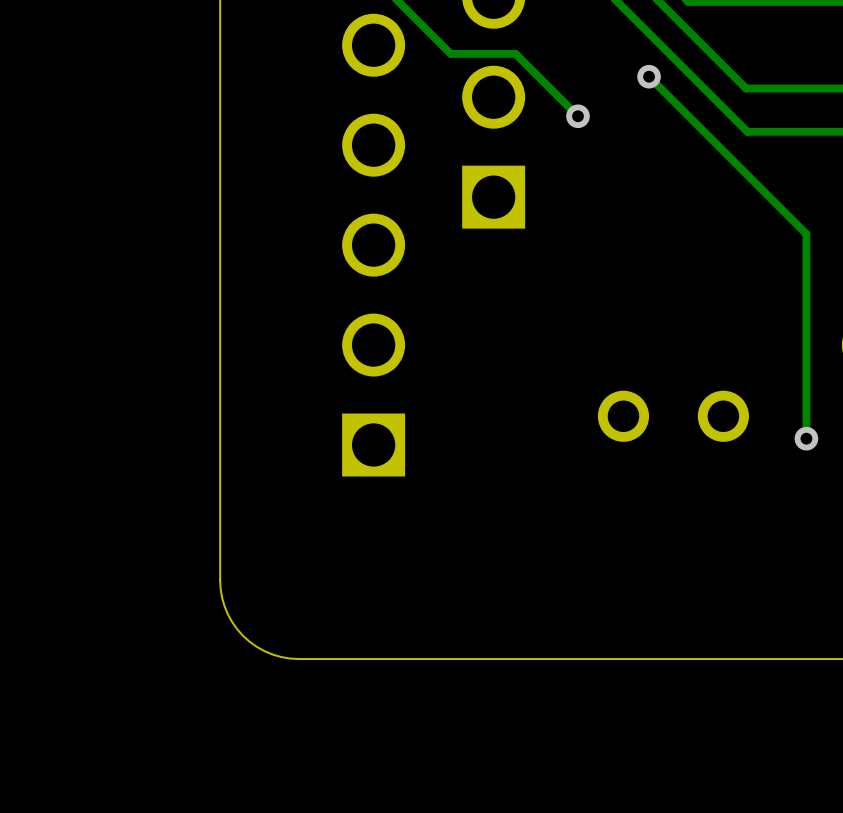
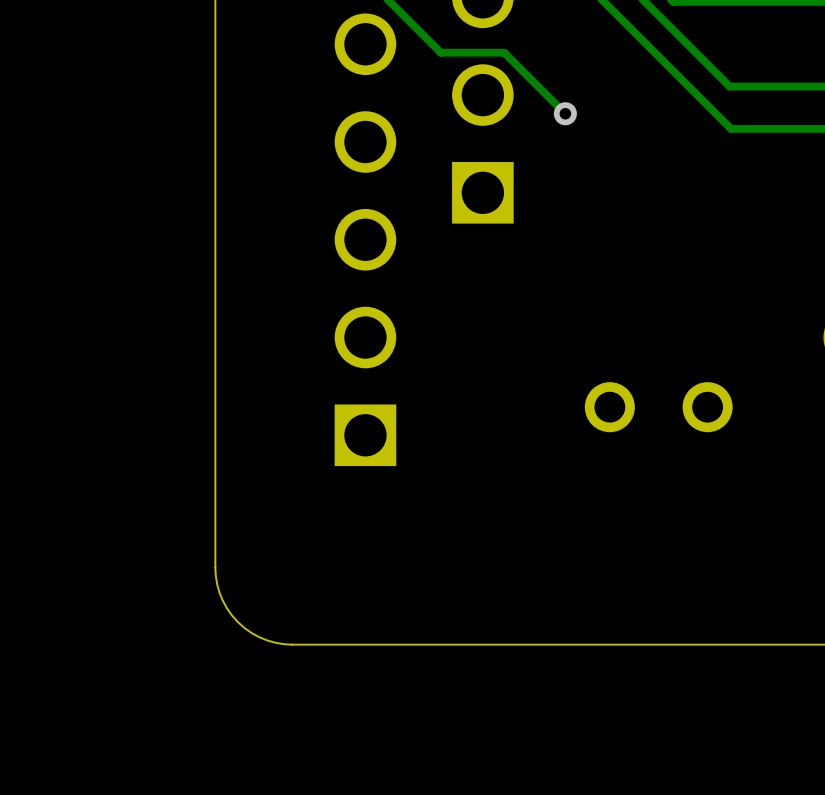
track: (649, 76) (806, 234) (806, 438) -> none
via: (649, 76) -> none
via: (806, 438) -> none

